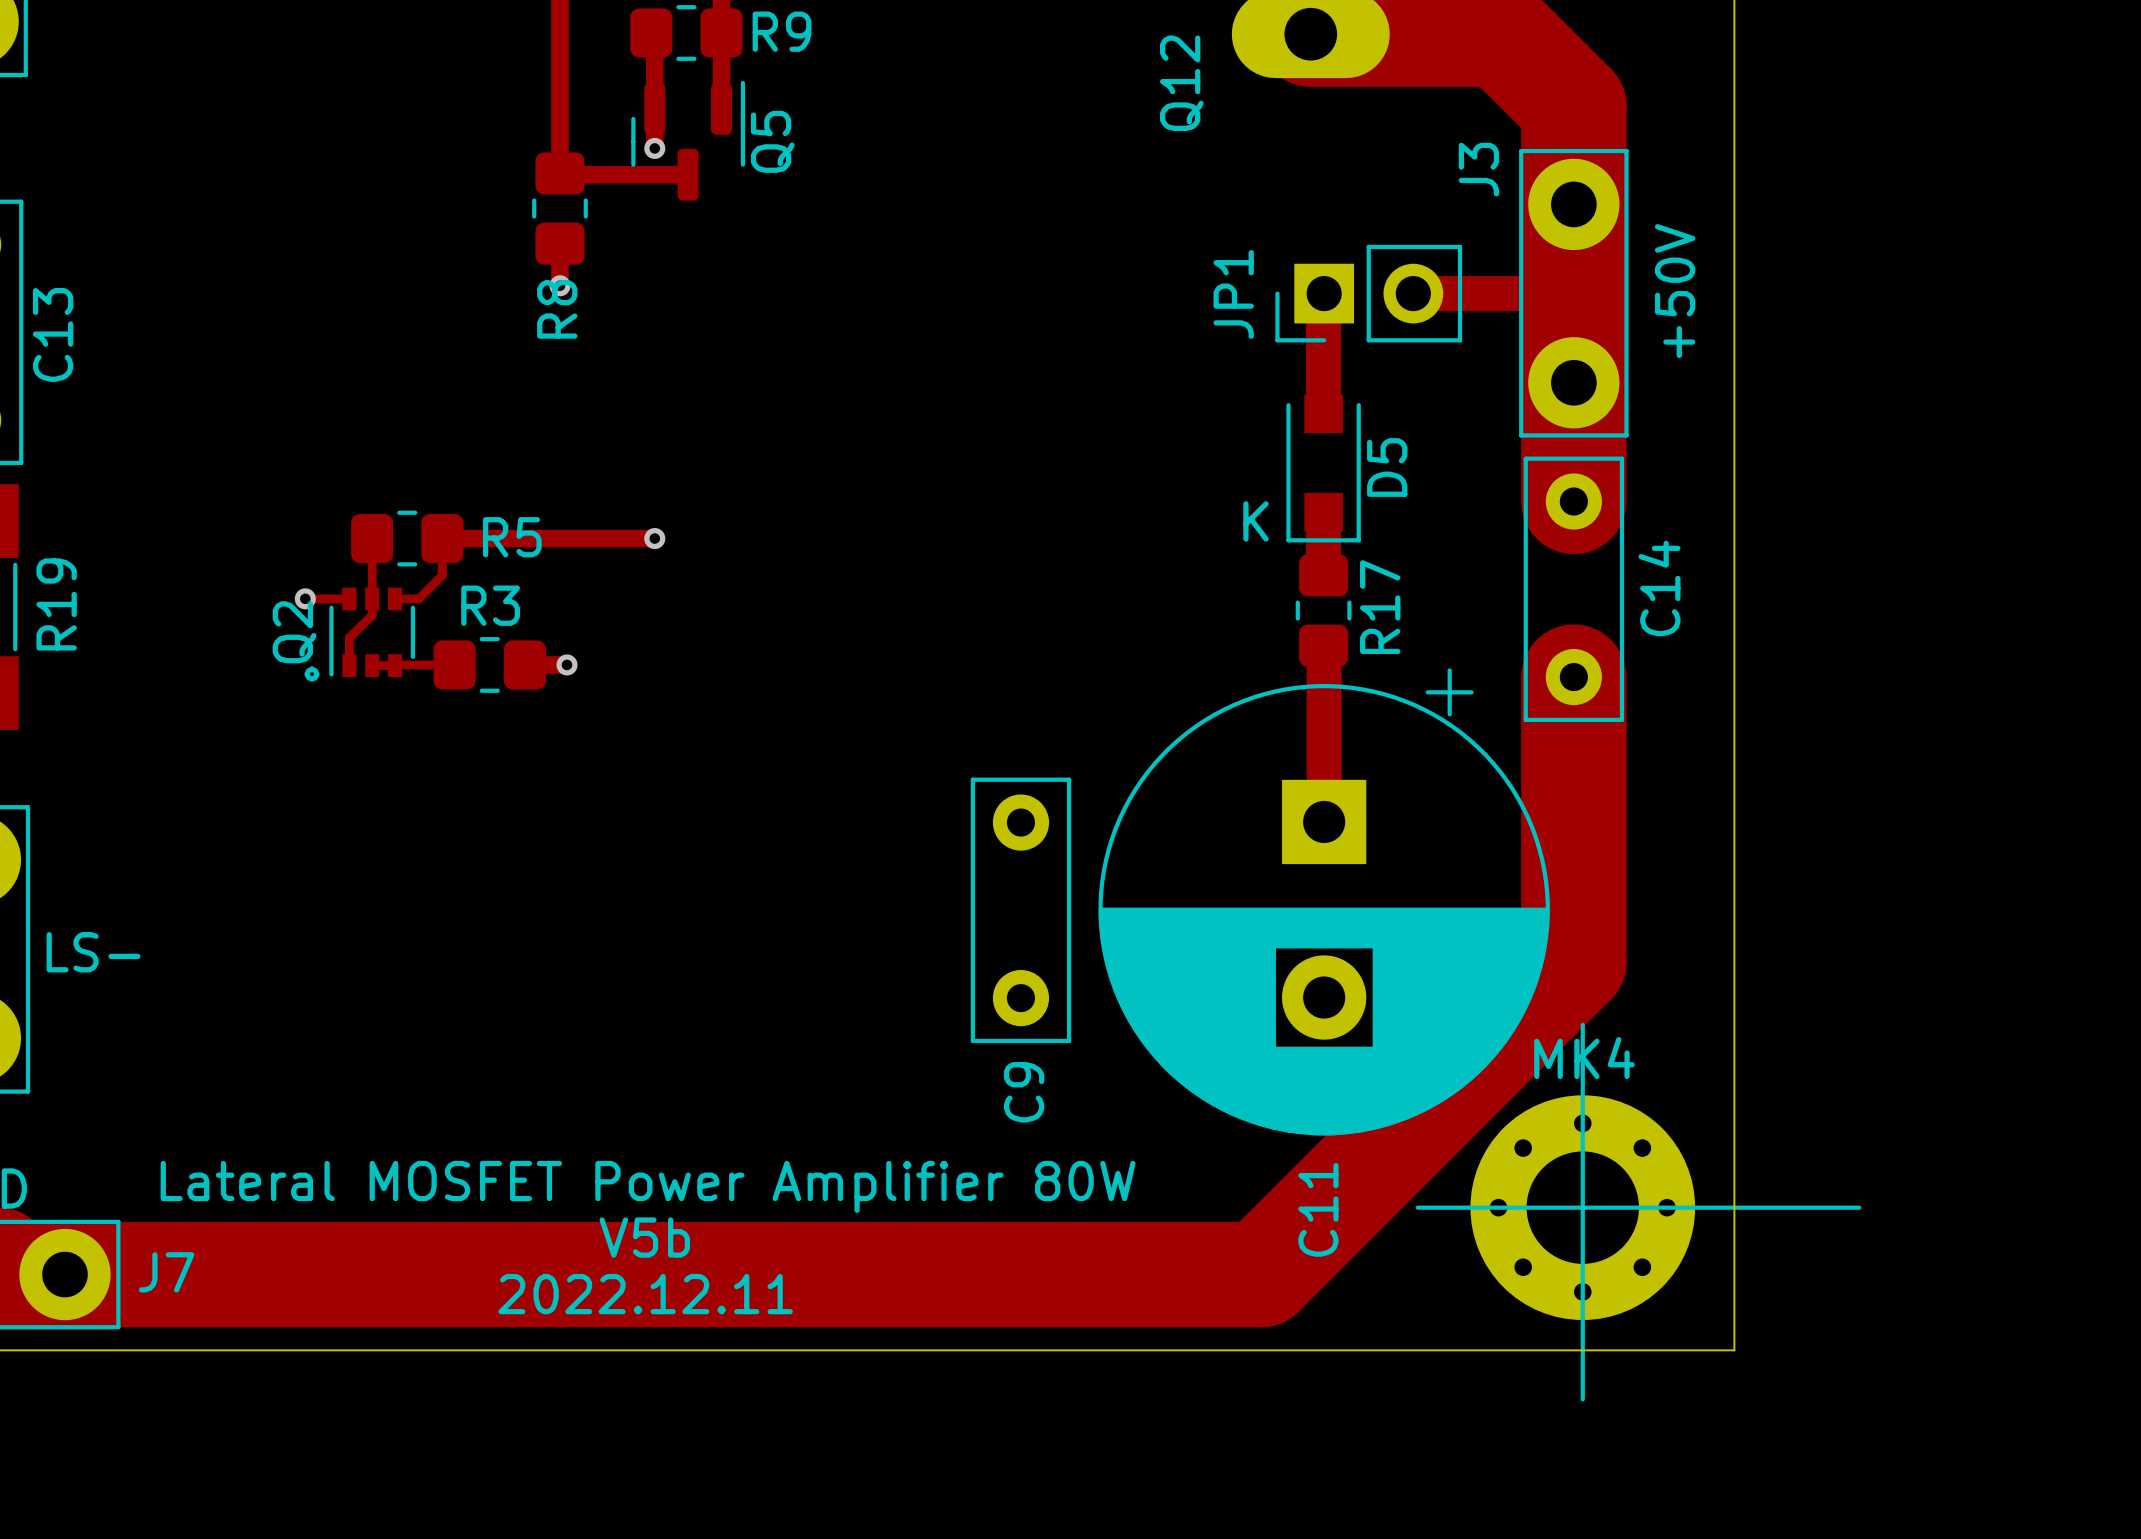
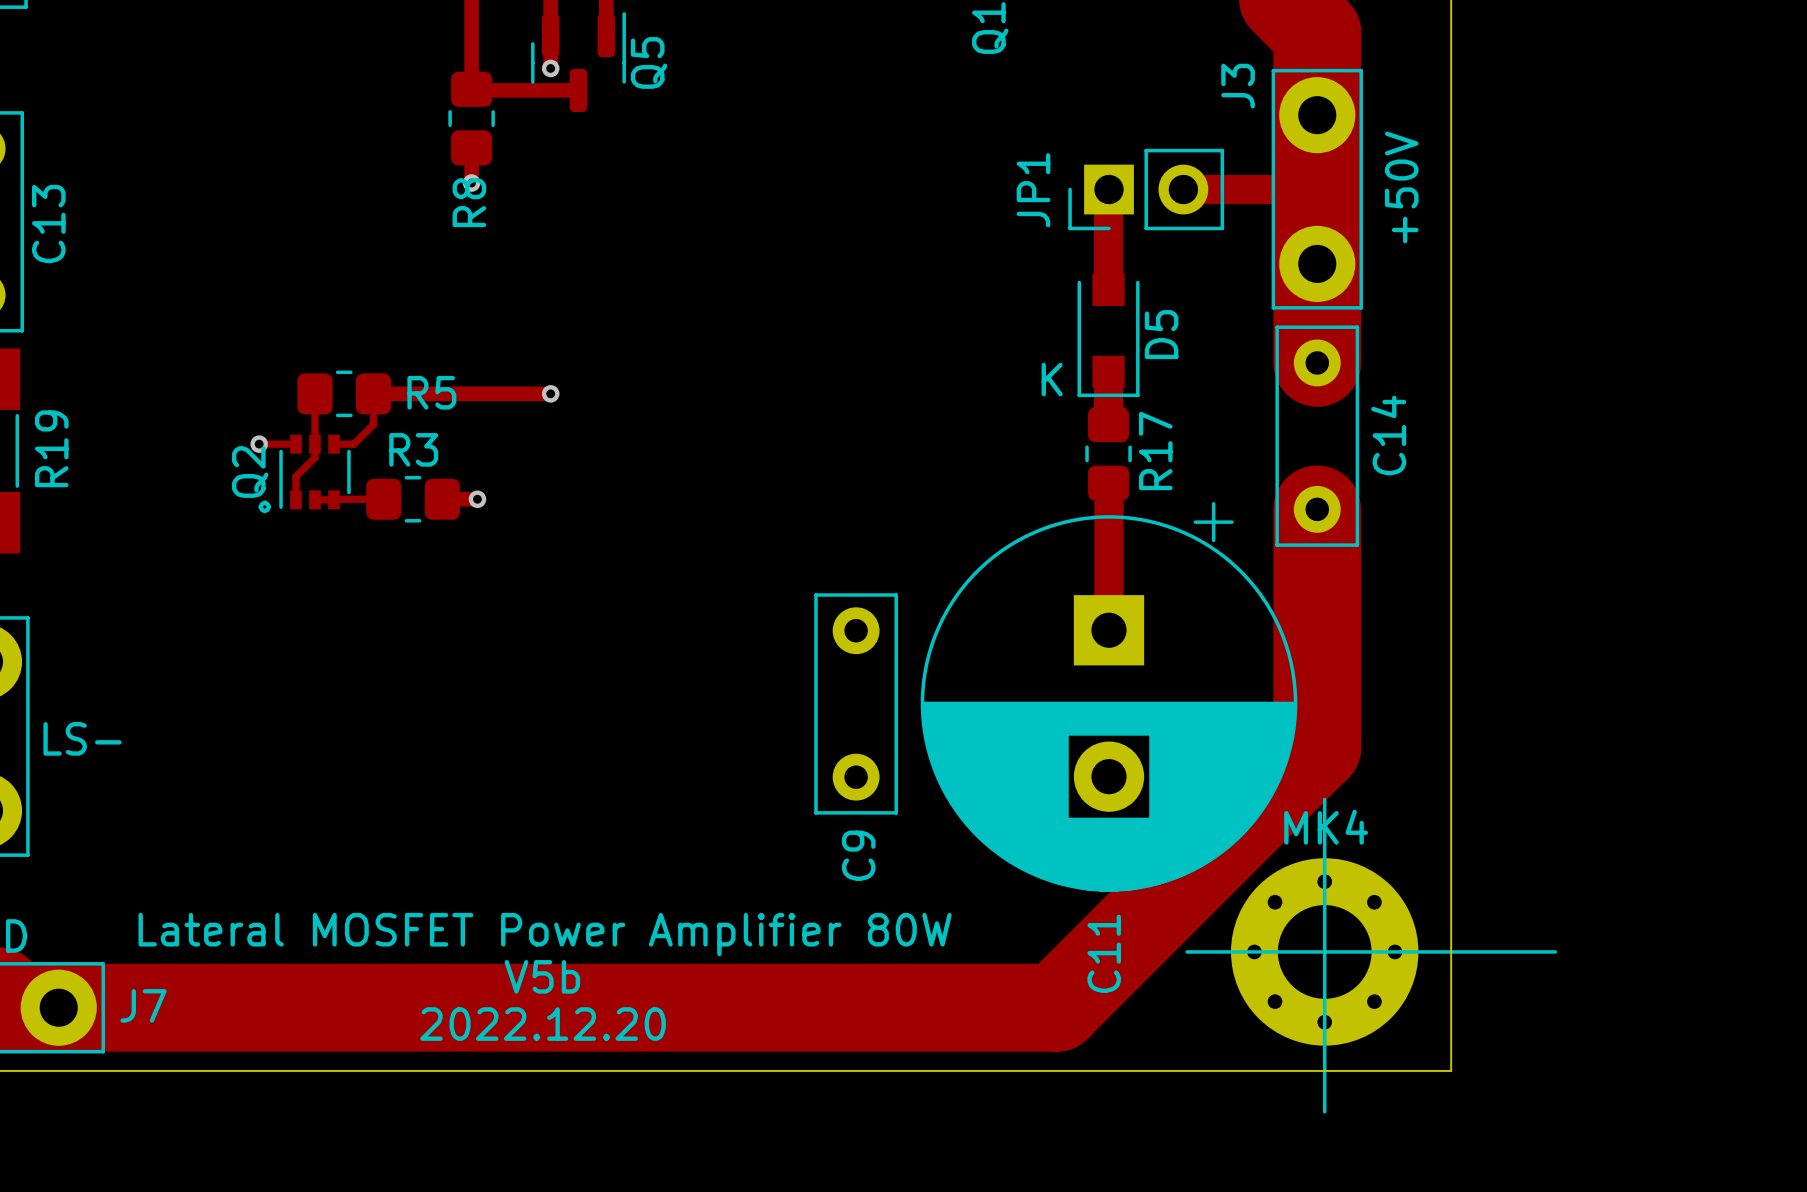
text: 2022.12.11 (645, 1294) -> 2022.12.20 (543, 1024)

